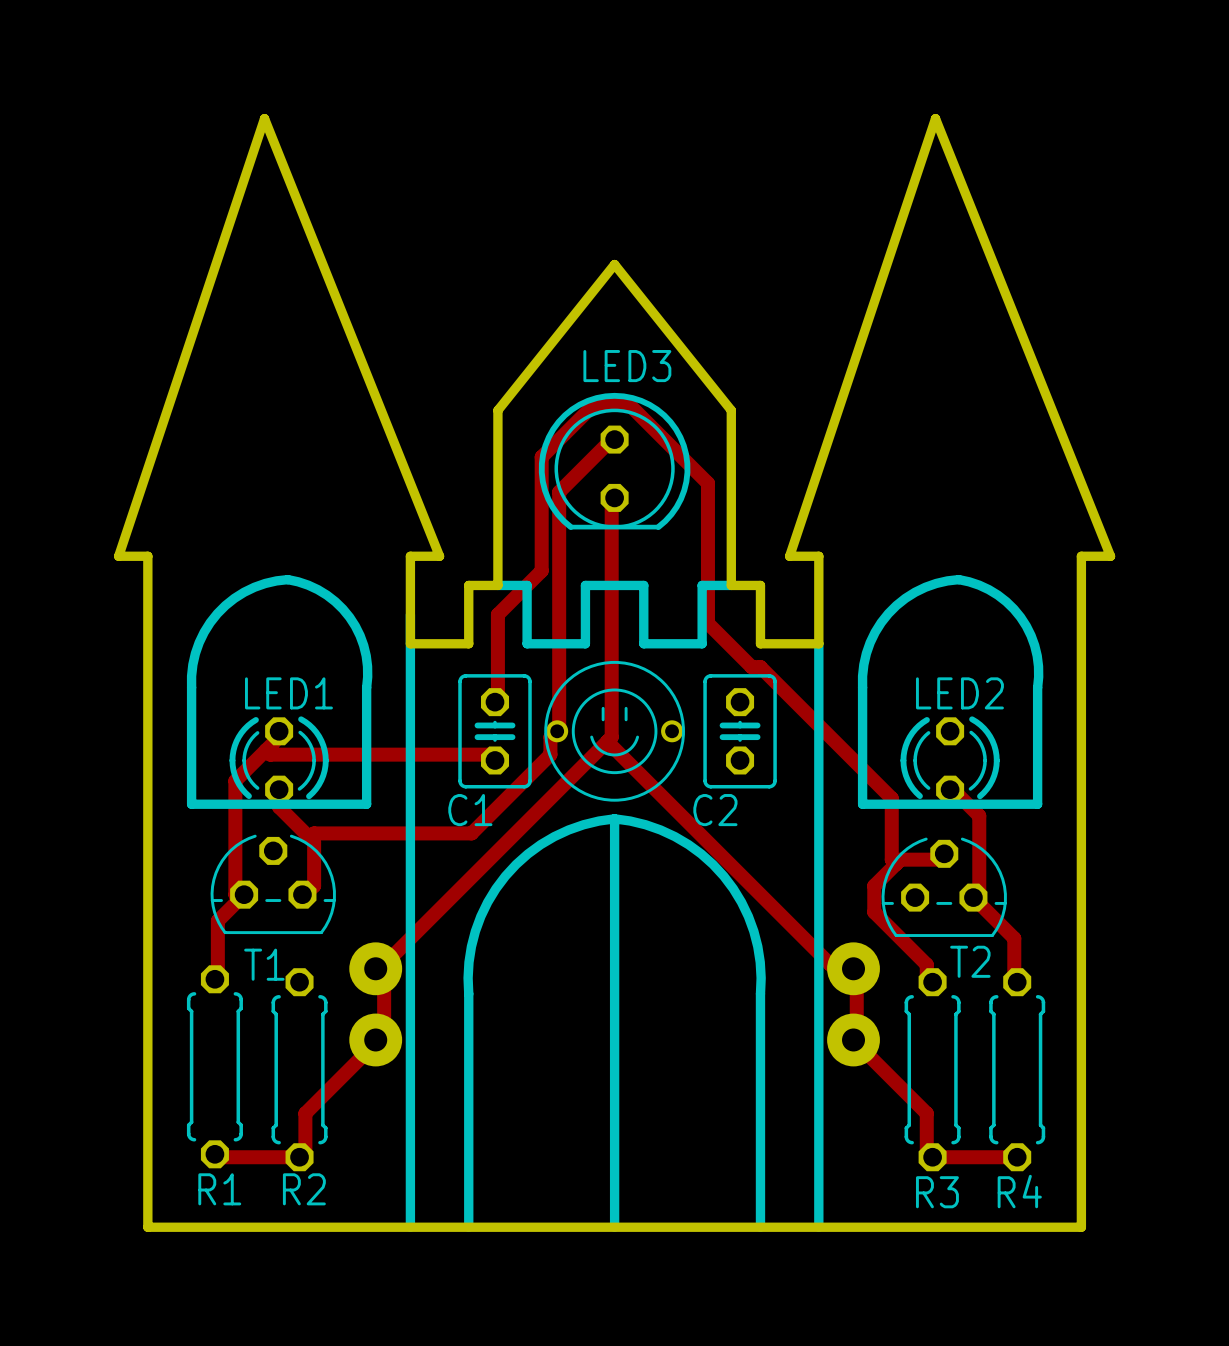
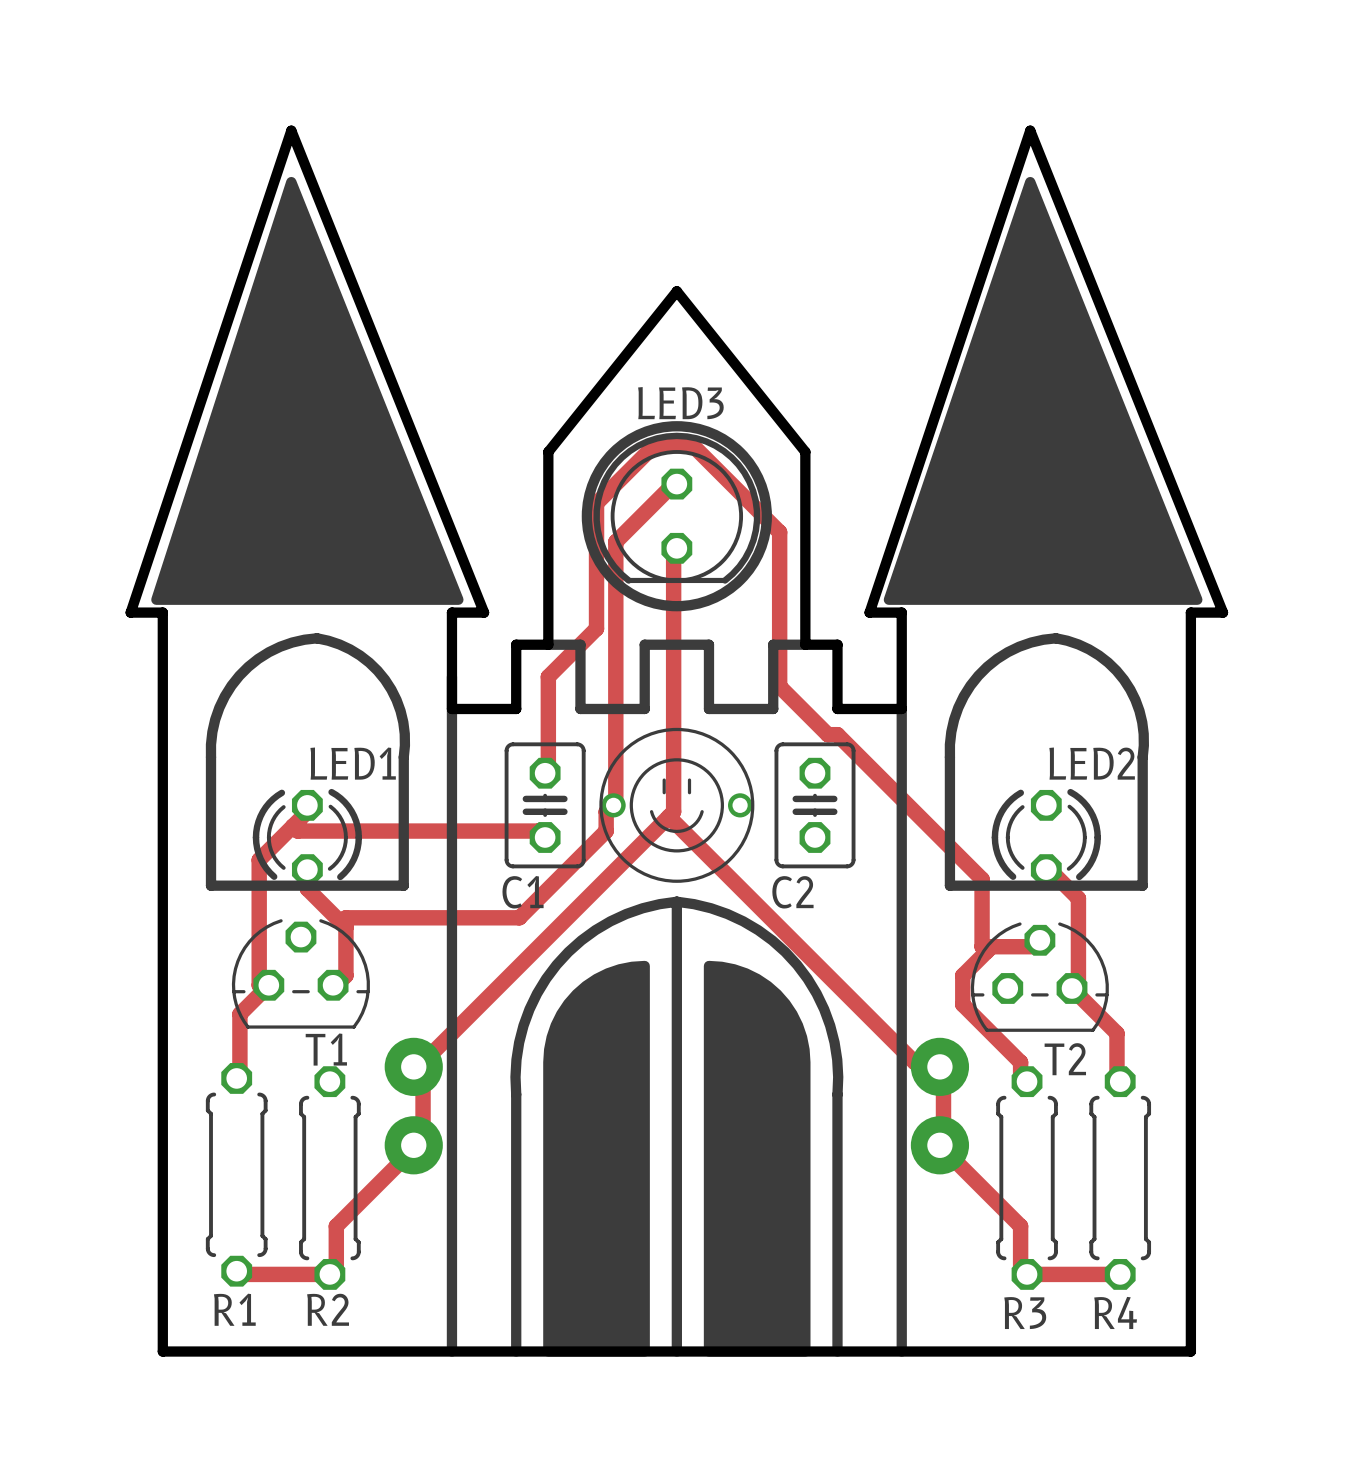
drawing: none -> [151, 176, 464, 605]
drawing: none -> [883, 176, 1203, 605]
drawing: none -> [581, 421, 772, 612]
LED1 name position: LED1 (288, 693) -> LED1 (353, 763)
LED2 name position: LED2 (959, 693) -> LED2 (1092, 763)
drawing: none -> [543, 960, 650, 1357]
drawing: none -> [703, 960, 811, 1357]
T1 name position: T1 (264, 964) -> T1 (326, 1049)

